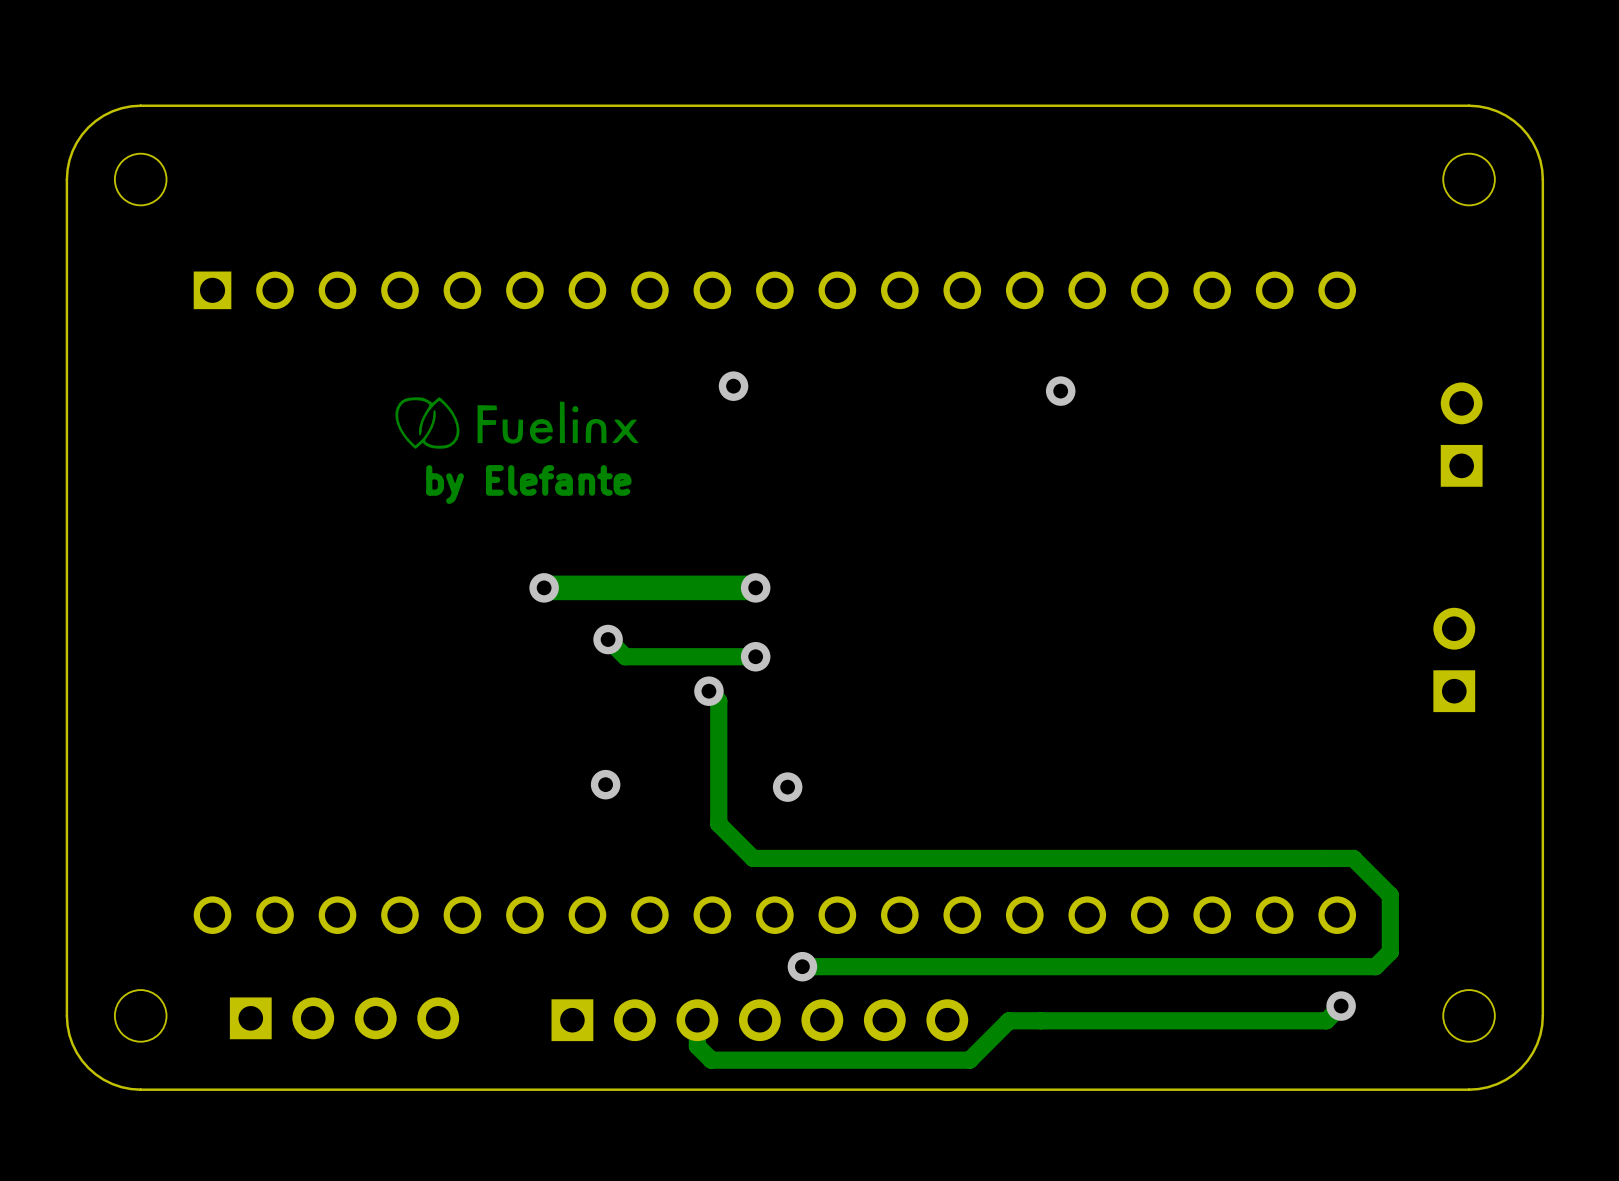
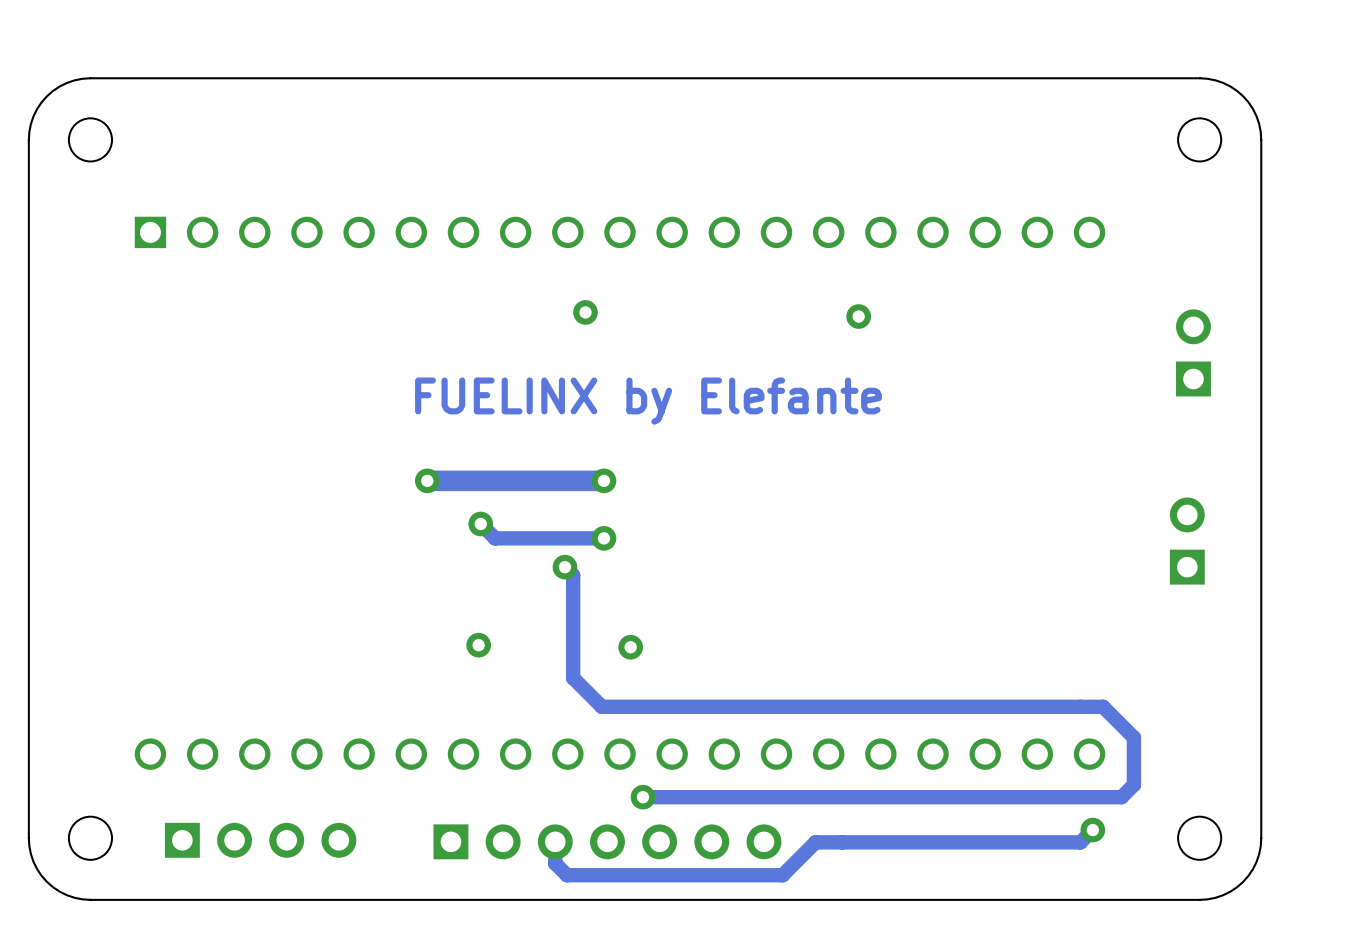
drawing: [395, 397, 639, 449] -> none
text: by Elefante (528, 484) -> FUELINX by Elefante (648, 401)

